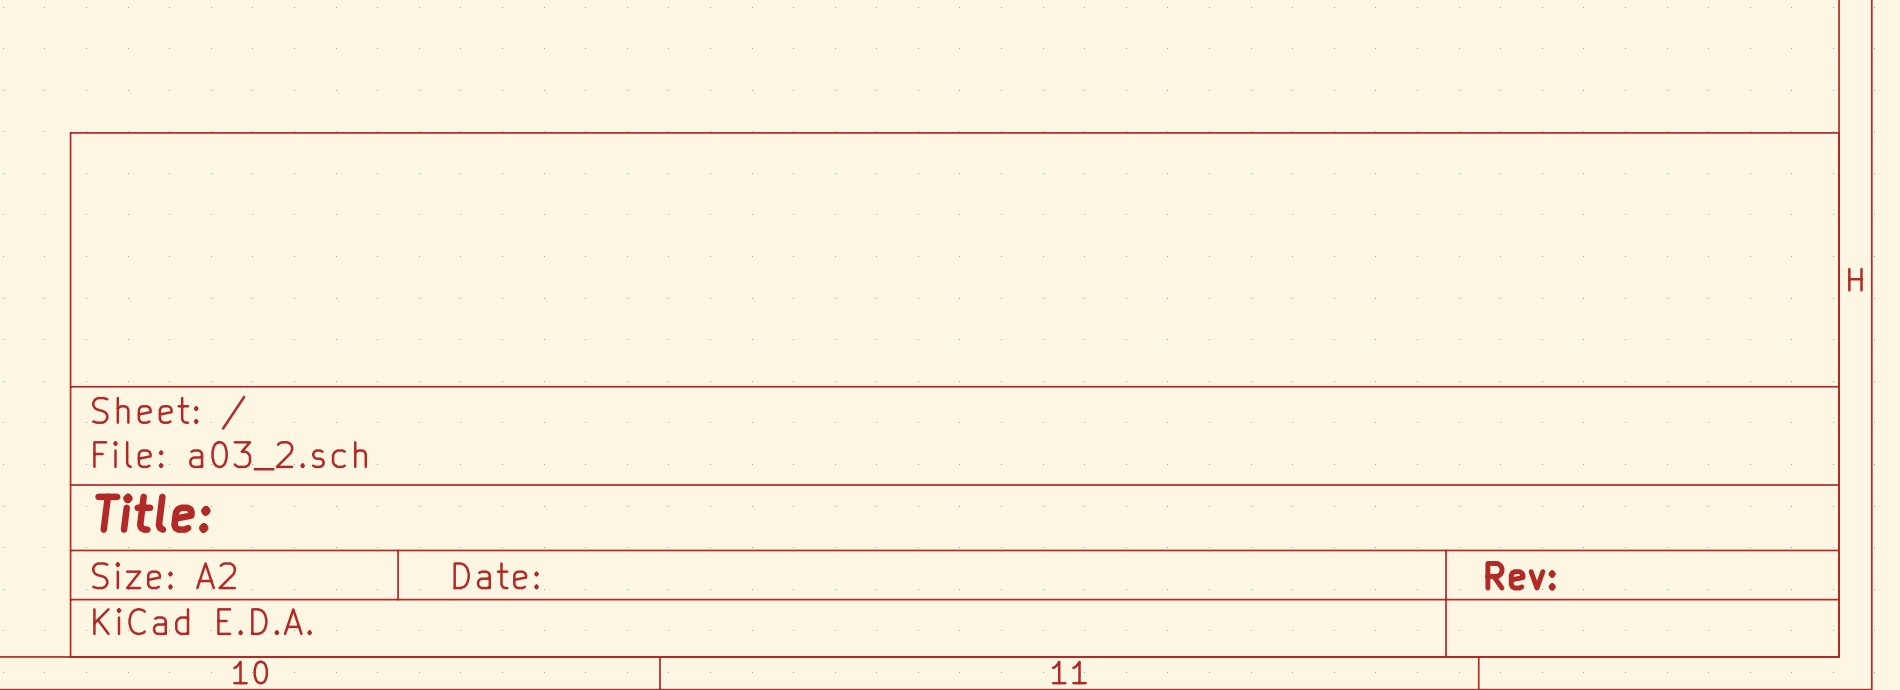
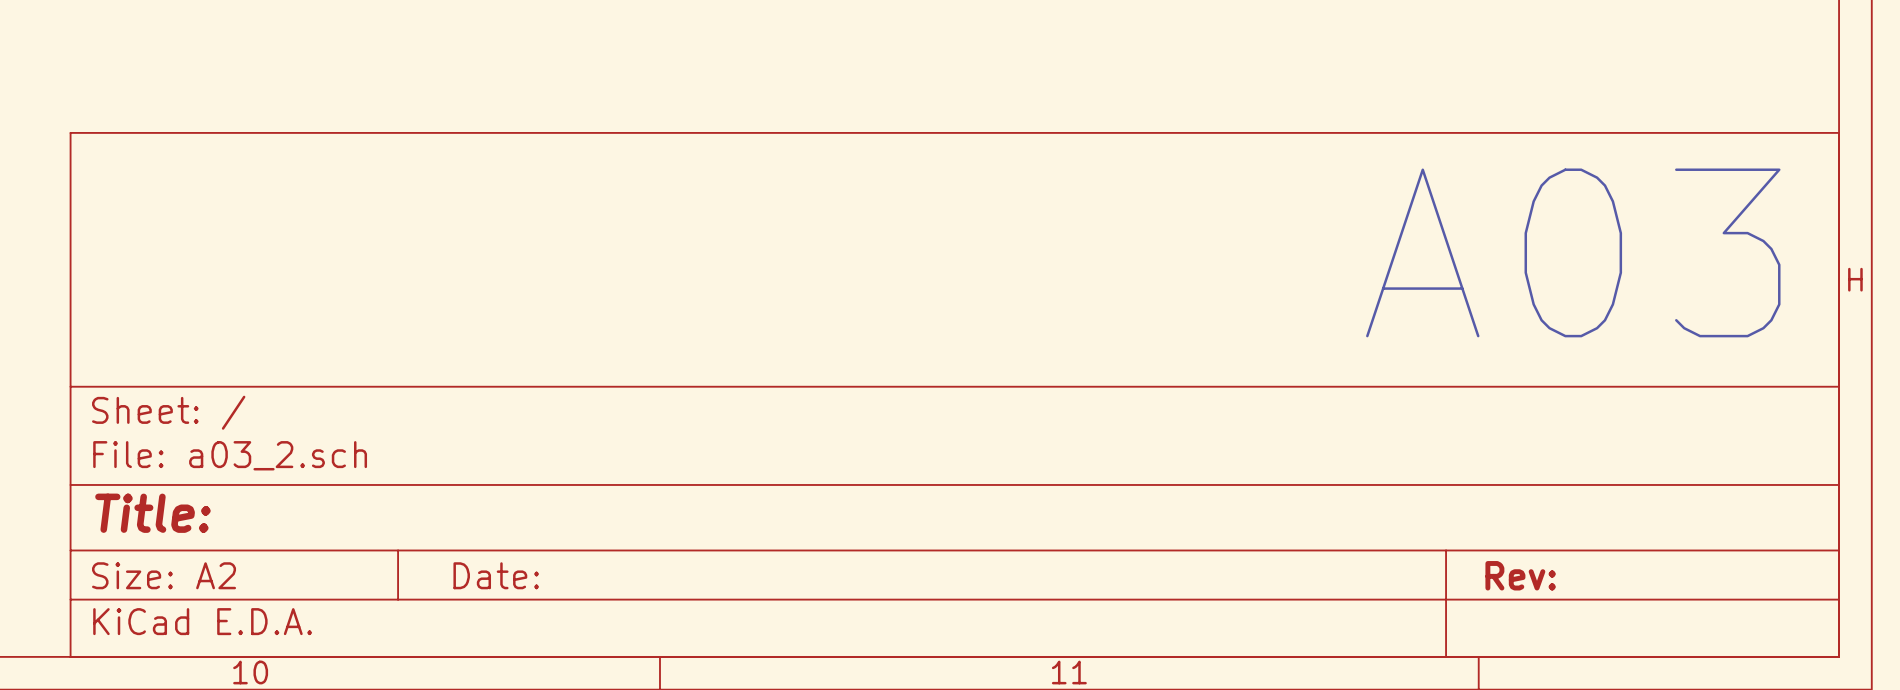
text: none -> A03 (1573, 252)

